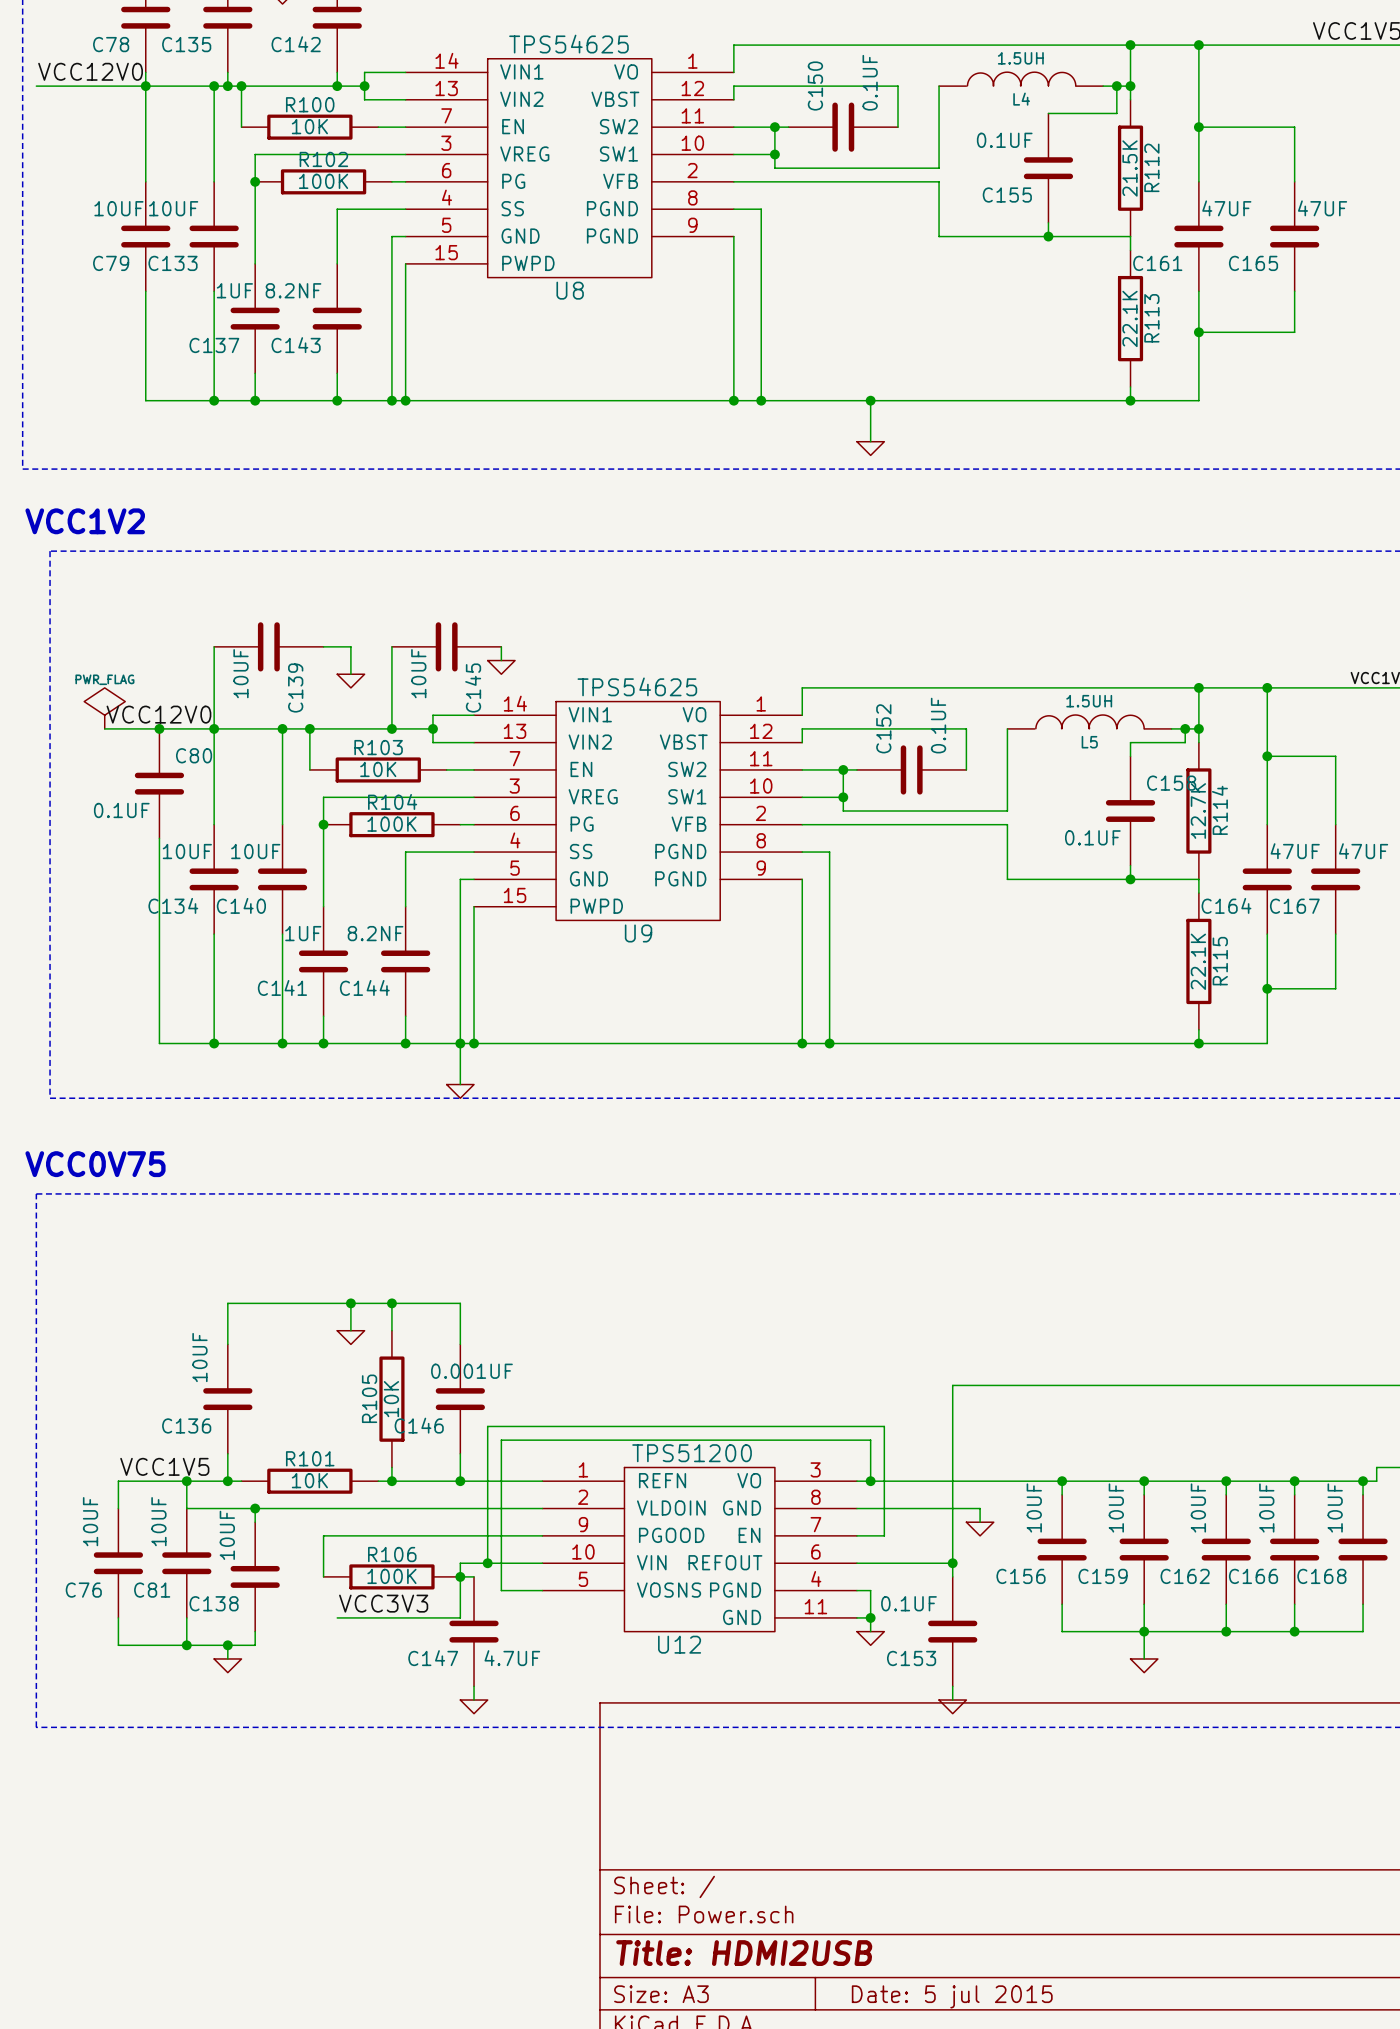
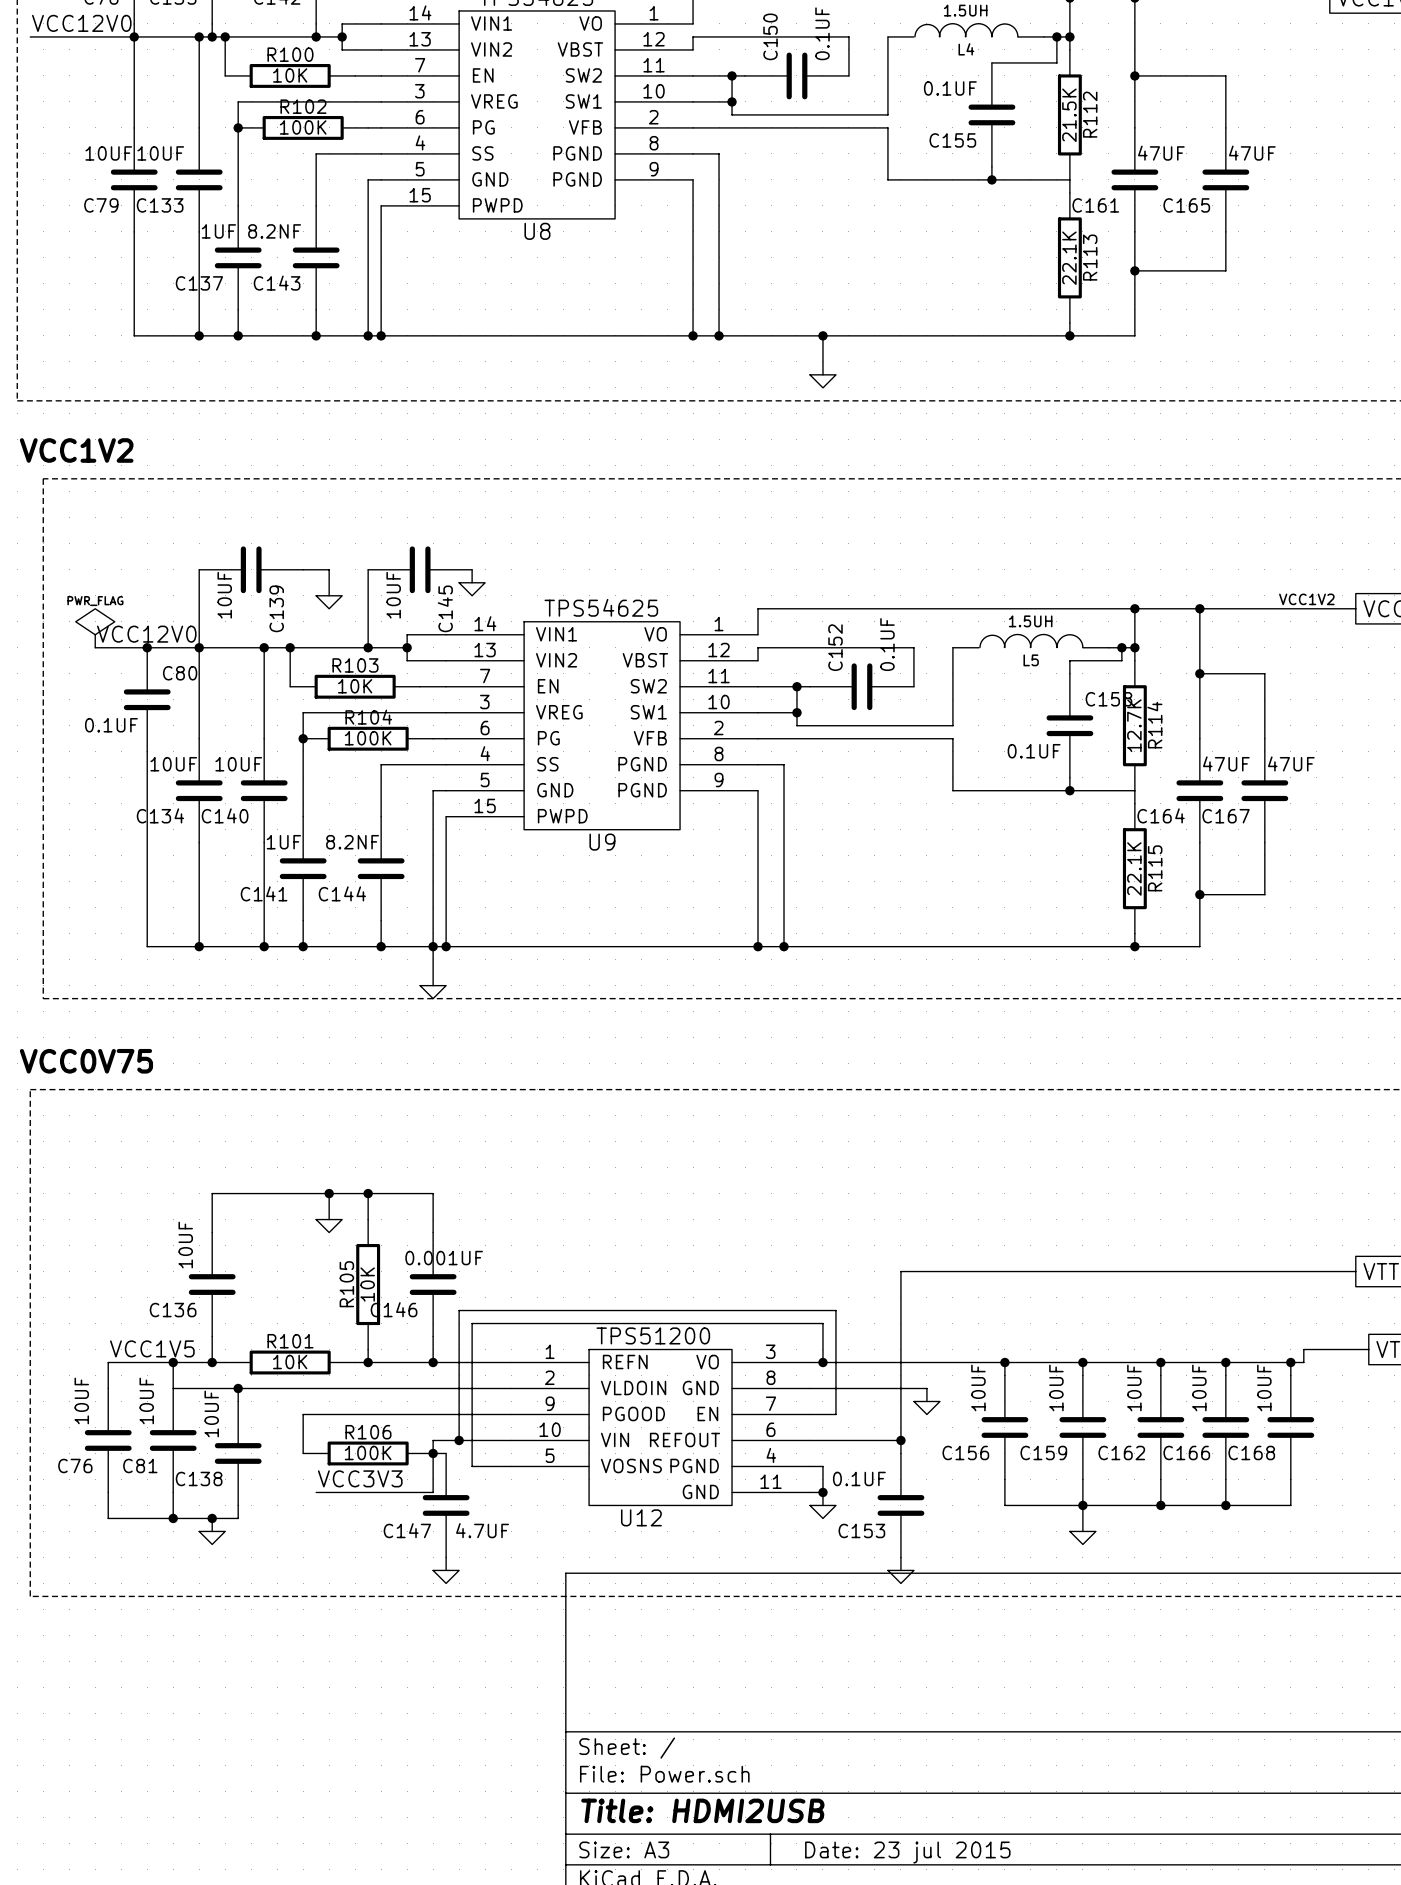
title block: Date: 5 jul 2015 (952, 1996) -> Date: 23 jul 2015 (907, 1852)

